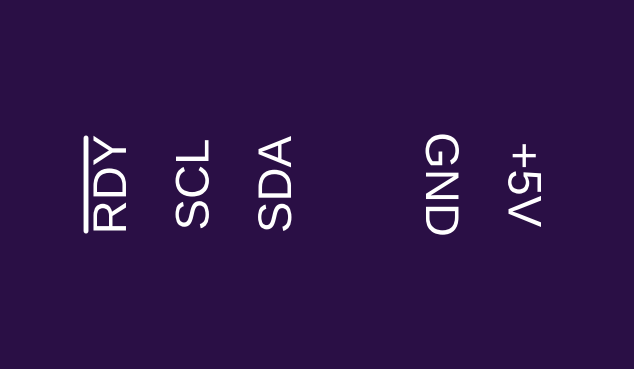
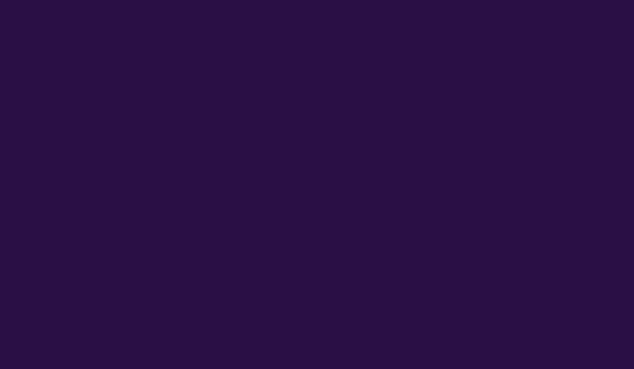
text: ~{RDY} (105, 183) -> none
text: SDA (274, 183) -> none
text: SCL (192, 184) -> none
text: GND (442, 184) -> none
text: +5V (524, 185) -> none

